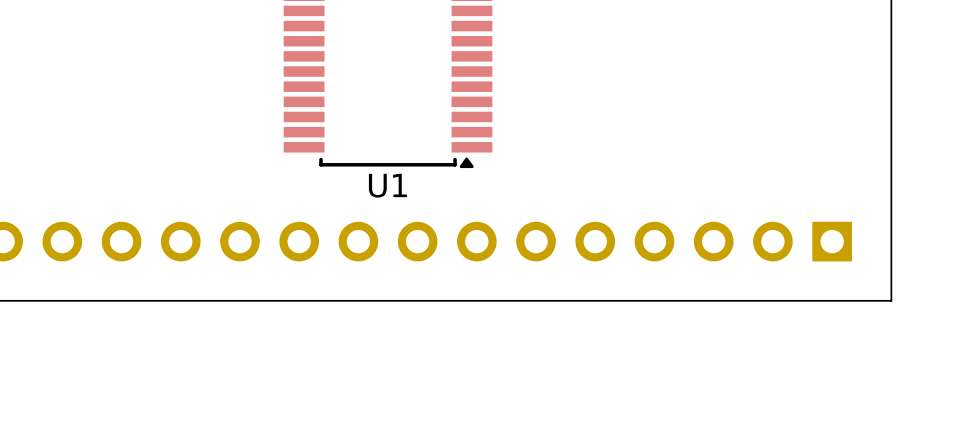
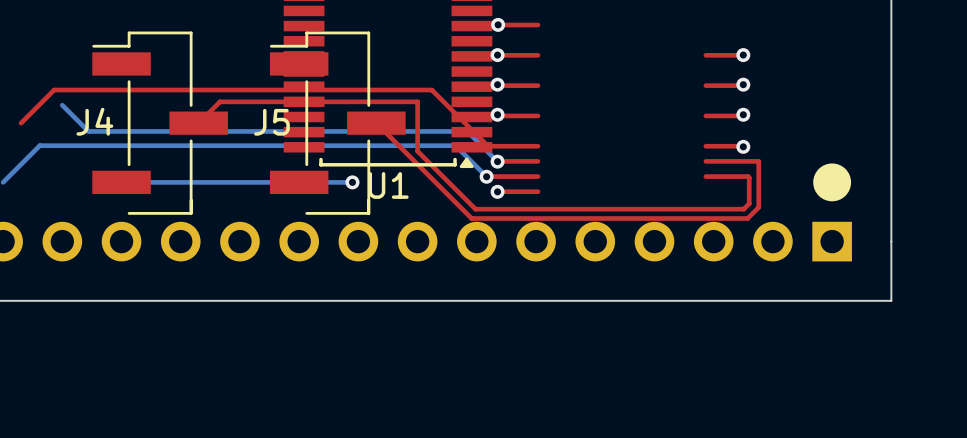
via: none -> (498, 24)
top track: none -> (498, 25) (537, 25)
top track: none -> (497, 55) (537, 55)
via: none -> (497, 55)
top track: none -> (705, 55) (743, 55)
via: none -> (743, 55)
top track: none -> (497, 84) (537, 85)
via: none -> (497, 84)
top track: none -> (743, 84) (705, 85)
via: none -> (743, 84)
bottom track: none -> (62, 105) (88, 131) (467, 131) (497, 161)
top track: none -> (497, 114) (537, 115)
via: none -> (497, 114)
top track: none -> (743, 114) (705, 115)
via: none -> (743, 114)
top track: none -> (21, 123) (54, 90) (431, 90) (488, 146) (537, 146)
J4: none -> (160, 123)
top track: none -> (198, 123) (220, 101) (417, 101) (417, 151) (475, 209) (743, 209) (749, 203) (748, 176) (705, 176)
J5: none -> (337, 123)
top track: none -> (376, 123) (471, 218) (747, 218) (758, 207) (758, 161) (705, 161)
top track: none -> (705, 146) (743, 146)
via: none -> (743, 146)
top track: none -> (497, 161) (537, 161)
via: none -> (497, 161)
drawing: none -> [813, 163, 852, 202]
top track: none -> (486, 176) (537, 176)
bottom track: none -> (486, 176) (455, 145) (39, 145) (3, 182)
via: none -> (486, 176)
bottom track: none -> (121, 182) (352, 182)
via: none -> (352, 182)
top track: none -> (497, 191) (537, 191)
via: none -> (497, 191)

